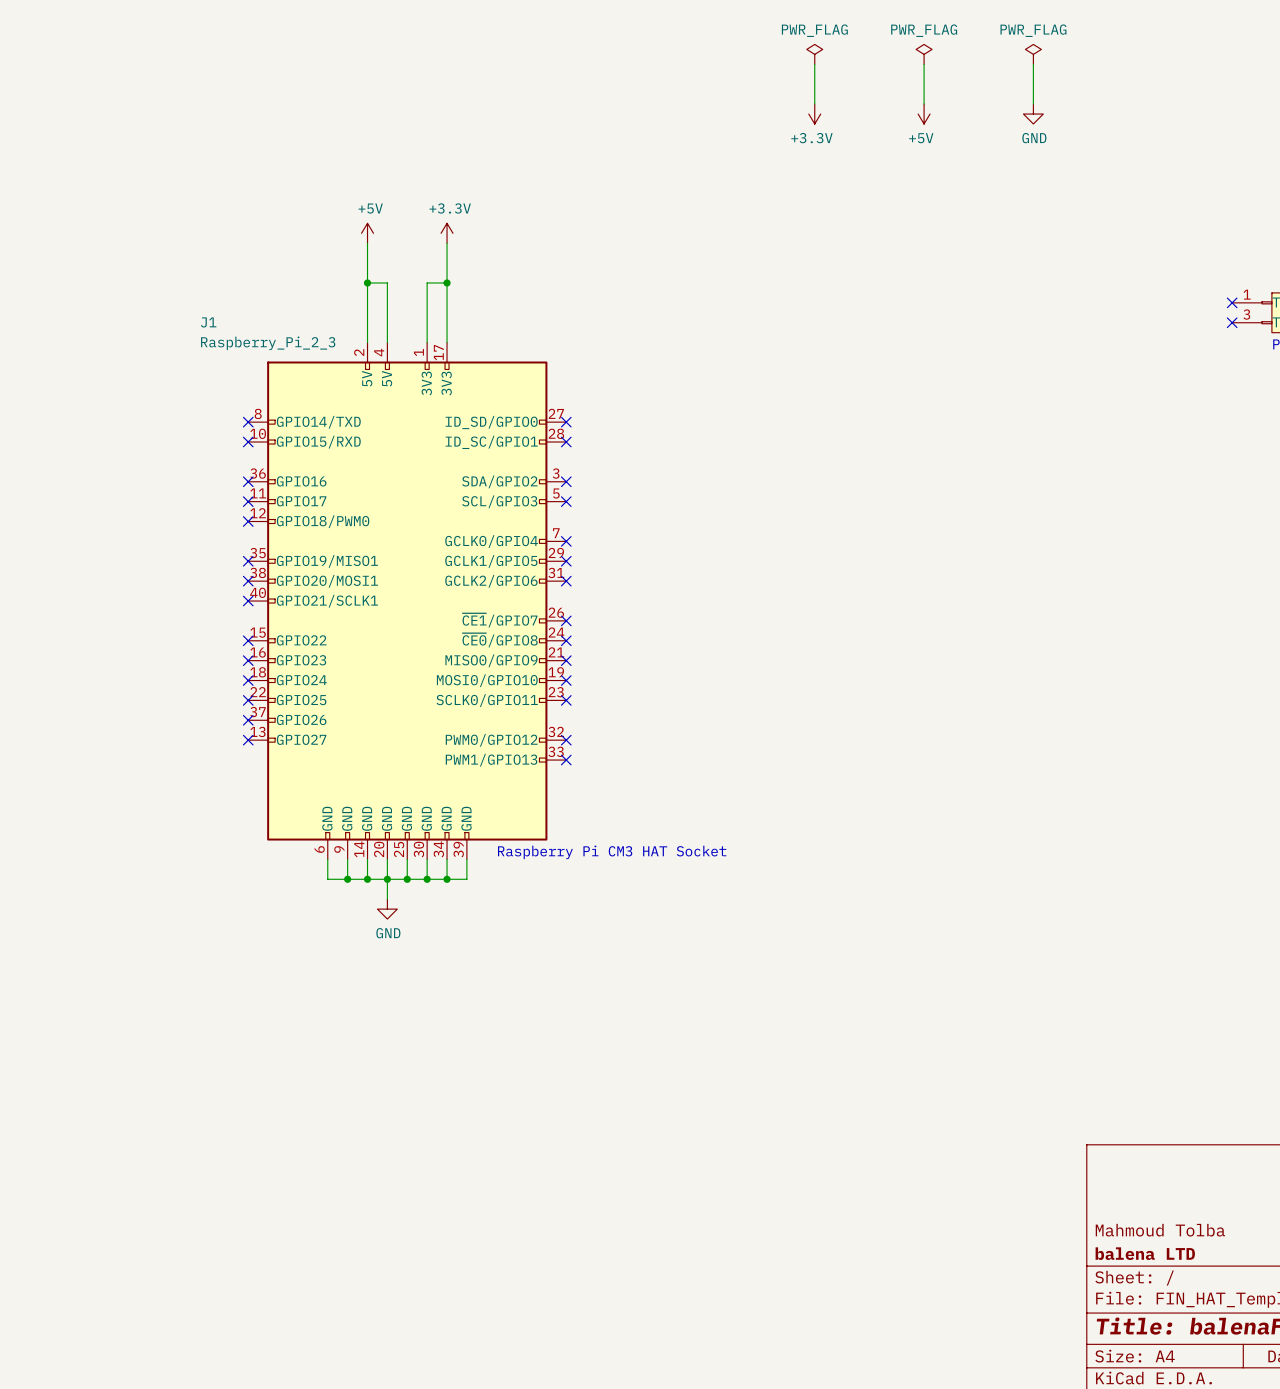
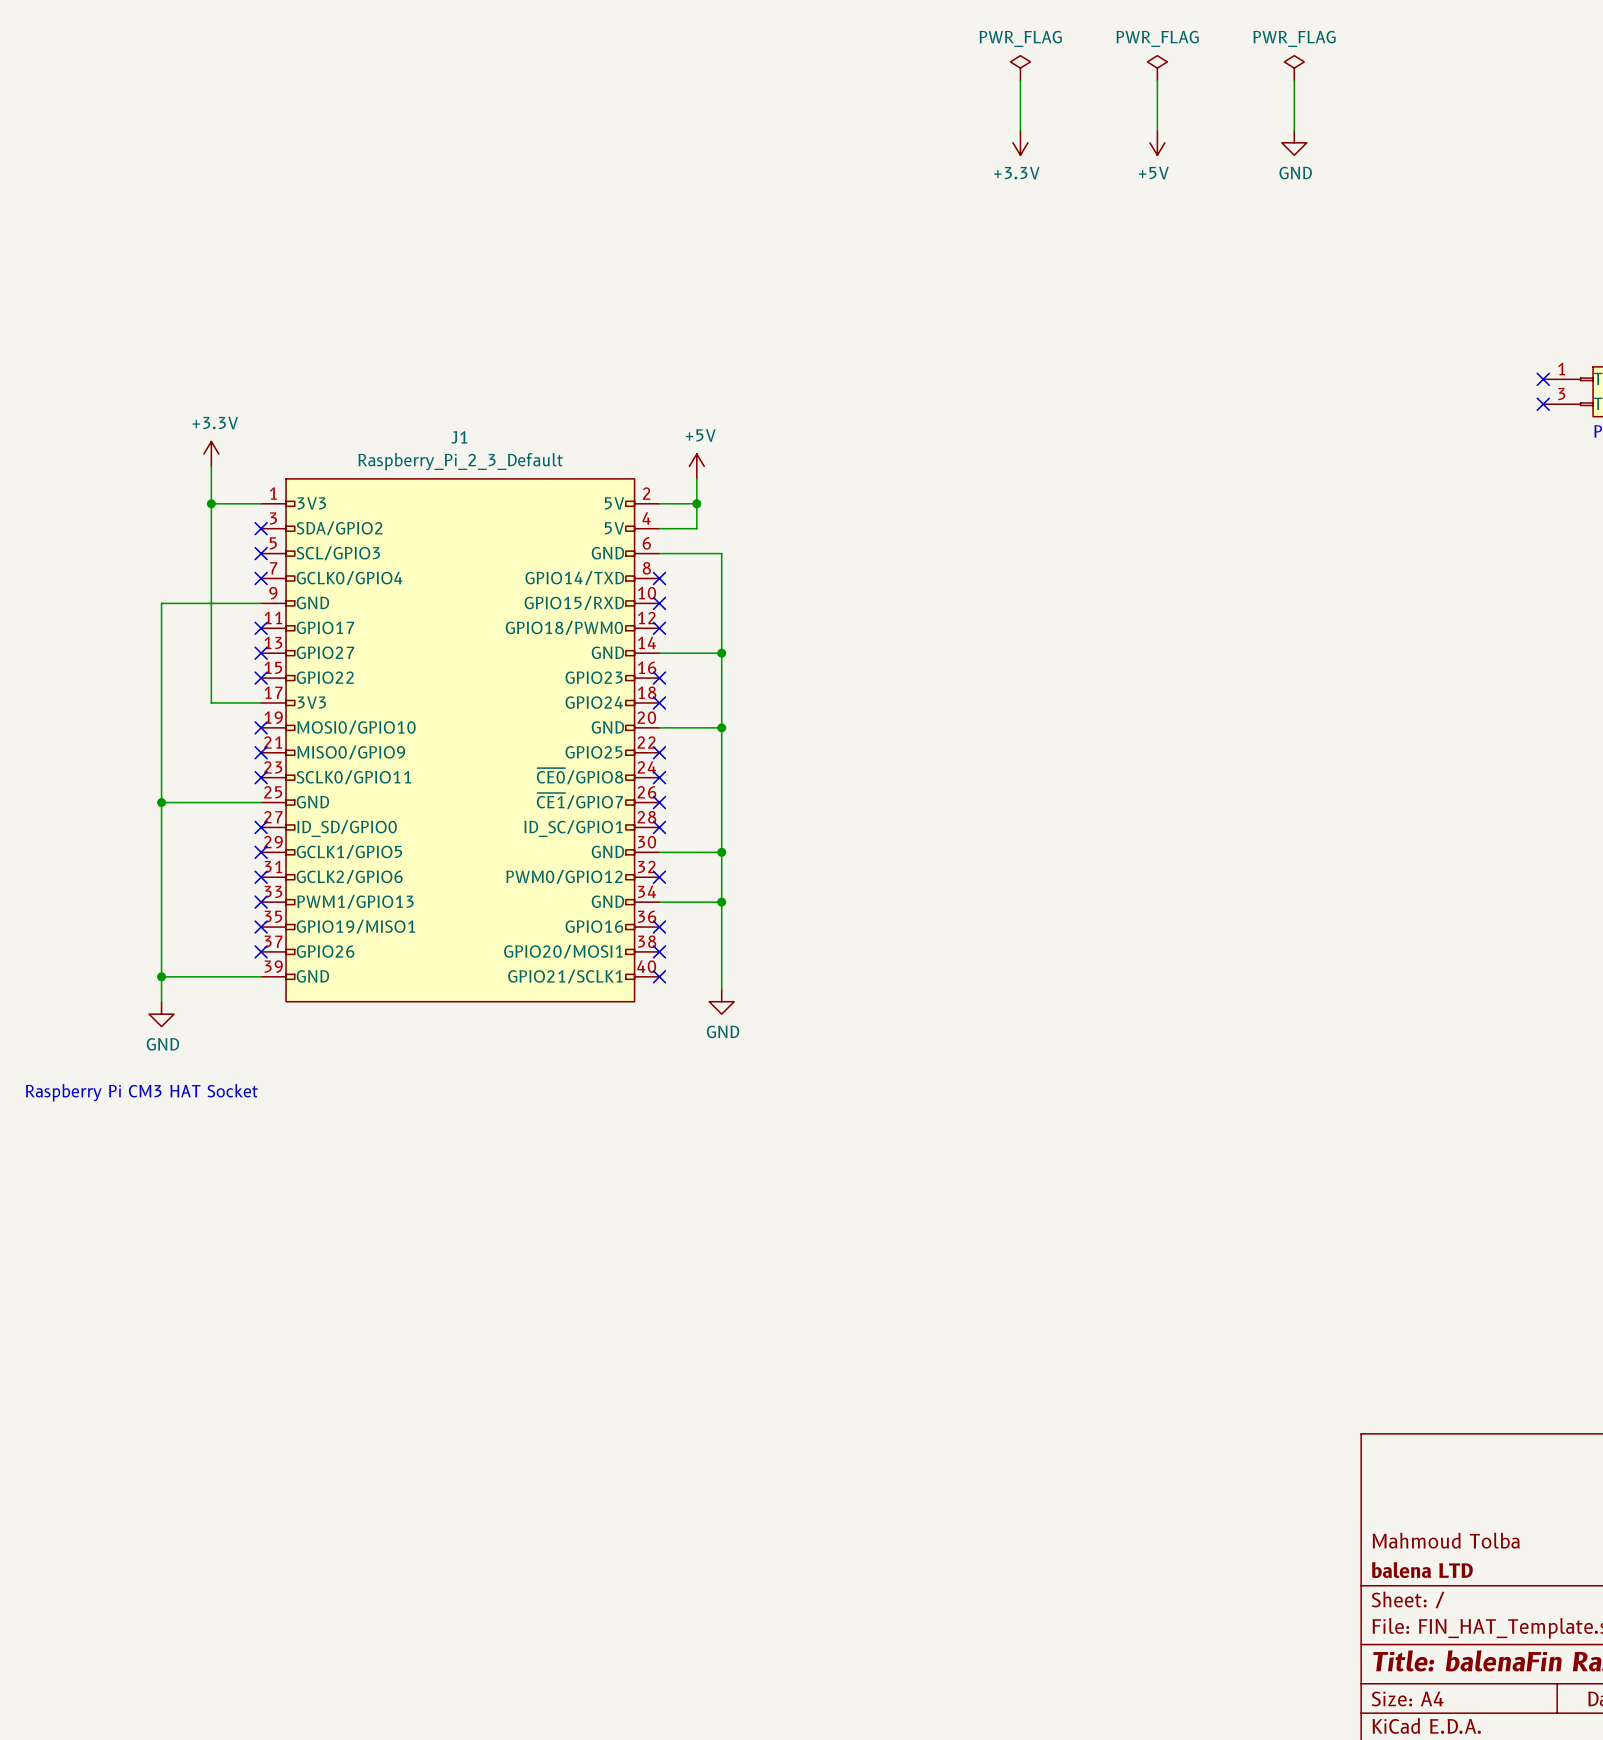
power symbol: +5V (367, 233) -> none
power symbol: +3.3V (447, 233) -> none
wire: (367, 243) (367, 342) -> none
wire: (447, 243) (447, 342) -> none
wire: (367, 282) (387, 282) (387, 342) -> none
junction: (367, 282) -> none
wire: (447, 282) (427, 282) (427, 342) -> none
junction: (447, 282) -> none
J1 name position: J1 (208, 322) -> J1 (459, 437)
J1 symbol: [248, 342, 567, 860] -> [261, 478, 660, 1002]
J1 value: Raspberry_Pi_2_3 (268, 343) -> Raspberry_Pi_2_3_Default (460, 461)
power symbol: none -> +3.3V (211, 454)
wire: none -> (211, 466) (211, 702) (261, 702)
power symbol: none -> +5V (696, 466)
wire: none -> (696, 478) (696, 528) (659, 528)
wire: none -> (211, 503) (261, 503)
junction: none -> (211, 503)
junction: none -> (696, 503)
no-connect mark: none -> (261, 528)
no-connect mark: (248, 422) -> none
no-connect mark: (566, 422) -> none
no-connect mark: none -> (261, 553)
no-connect mark: (248, 442) -> none
wire: none -> (659, 553) (721, 553) (721, 989)
no-connect mark: (566, 442) -> none
no-connect mark: none -> (261, 578)
no-connect mark: none -> (659, 578)
wire: none -> (261, 603) (161, 603) (161, 1001)
no-connect mark: (248, 481) -> none
no-connect mark: none -> (659, 603)
no-connect mark: (566, 481) -> none
no-connect mark: none -> (261, 628)
no-connect mark: (248, 501) -> none
no-connect mark: none -> (659, 628)
no-connect mark: (566, 501) -> none
no-connect mark: none -> (261, 653)
no-connect mark: (248, 521) -> none
wire: none -> (659, 653) (721, 653)
junction: none -> (721, 653)
no-connect mark: none -> (261, 678)
no-connect mark: none -> (659, 678)
no-connect mark: (566, 541) -> none
no-connect mark: (248, 561) -> none
no-connect mark: none -> (659, 702)
no-connect mark: (566, 561) -> none
no-connect mark: none -> (261, 727)
no-connect mark: (248, 581) -> none
no-connect mark: (566, 581) -> none
junction: none -> (721, 727)
no-connect mark: none -> (261, 752)
no-connect mark: (248, 601) -> none
no-connect mark: none -> (659, 752)
no-connect mark: none -> (261, 777)
no-connect mark: none -> (659, 777)
no-connect mark: (566, 620) -> none
wire: none -> (161, 802) (261, 802)
junction: none -> (161, 802)
no-connect mark: (248, 640) -> none
no-connect mark: none -> (659, 802)
no-connect mark: (566, 640) -> none
no-connect mark: none -> (261, 827)
no-connect mark: (248, 660) -> none
no-connect mark: none -> (659, 827)
no-connect mark: (566, 660) -> none
no-connect mark: none -> (261, 852)
no-connect mark: (248, 680) -> none
no-connect mark: (566, 680) -> none
junction: none -> (721, 852)
no-connect mark: none -> (261, 877)
no-connect mark: (248, 700) -> none
no-connect mark: none -> (659, 877)
no-connect mark: (566, 700) -> none
no-connect mark: none -> (261, 902)
no-connect mark: (248, 720) -> none
wire: none -> (659, 902) (721, 902)
junction: none -> (721, 902)
no-connect mark: none -> (261, 927)
no-connect mark: (248, 740) -> none
no-connect mark: none -> (659, 927)
no-connect mark: (566, 740) -> none
no-connect mark: none -> (261, 951)
no-connect mark: none -> (659, 951)
no-connect mark: (566, 760) -> none
wire: none -> (161, 976) (261, 976)
junction: none -> (161, 976)
no-connect mark: none -> (659, 976)
power symbol: none -> GND (721, 1001)
power symbol: none -> GND (161, 1014)
text: Raspberry Pi CM3 HAT Socket (612, 852) -> none
wire: (327, 859) (327, 879) (466, 879) (466, 859) -> none
wire: (347, 859) (347, 879) -> none
wire: (367, 859) (367, 879) -> none
wire: (387, 859) (387, 899) -> none
wire: (407, 859) (407, 879) -> none
wire: (427, 859) (427, 879) -> none
wire: (447, 859) (447, 879) -> none
text: none -> Raspberry Pi CM3 HAT Socket (141, 1092)
junction: (347, 879) -> none
junction: (367, 879) -> none
junction: (387, 879) -> none
junction: (407, 879) -> none
junction: (427, 879) -> none
junction: (447, 879) -> none
power symbol: GND (387, 909) -> none

